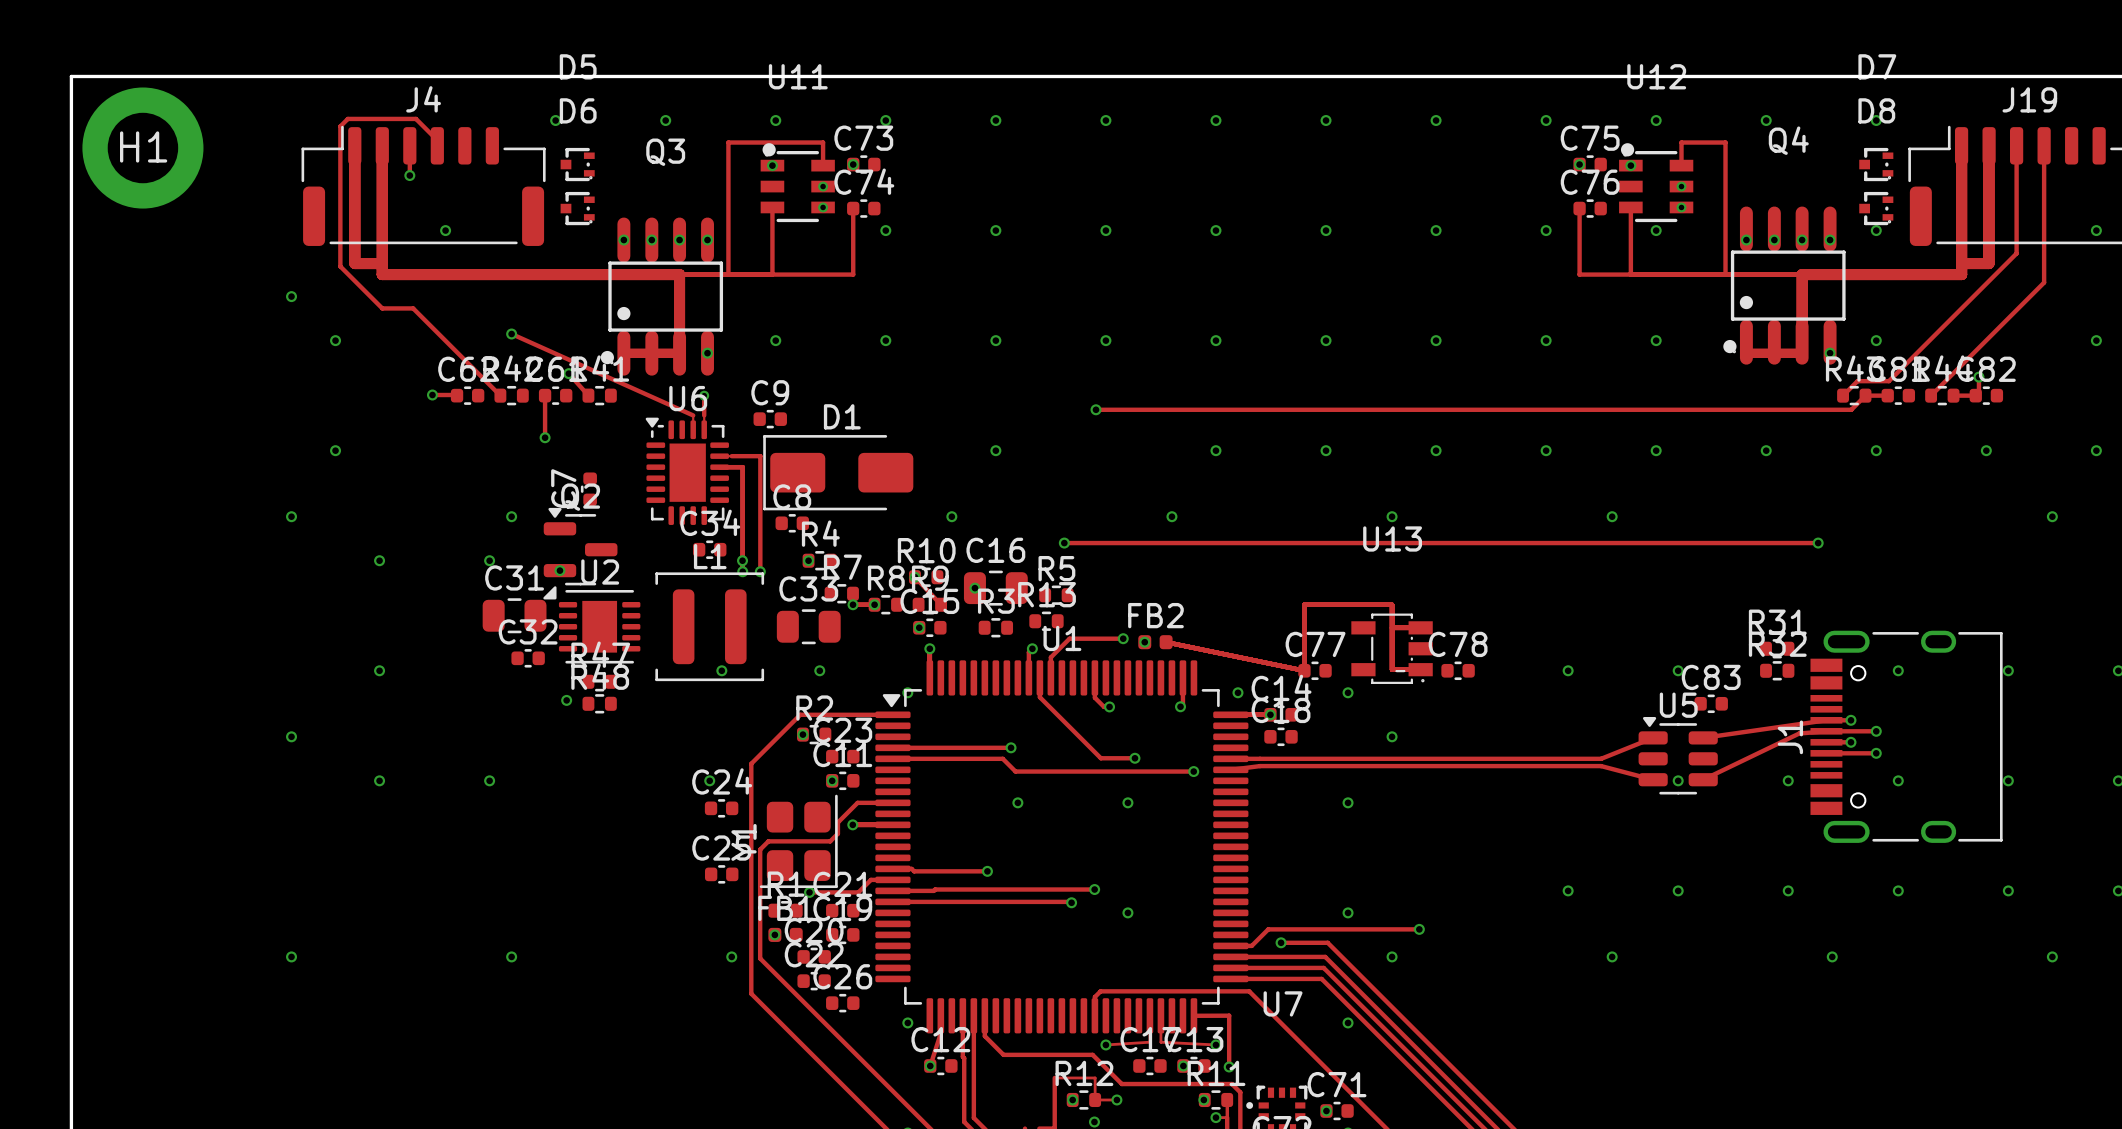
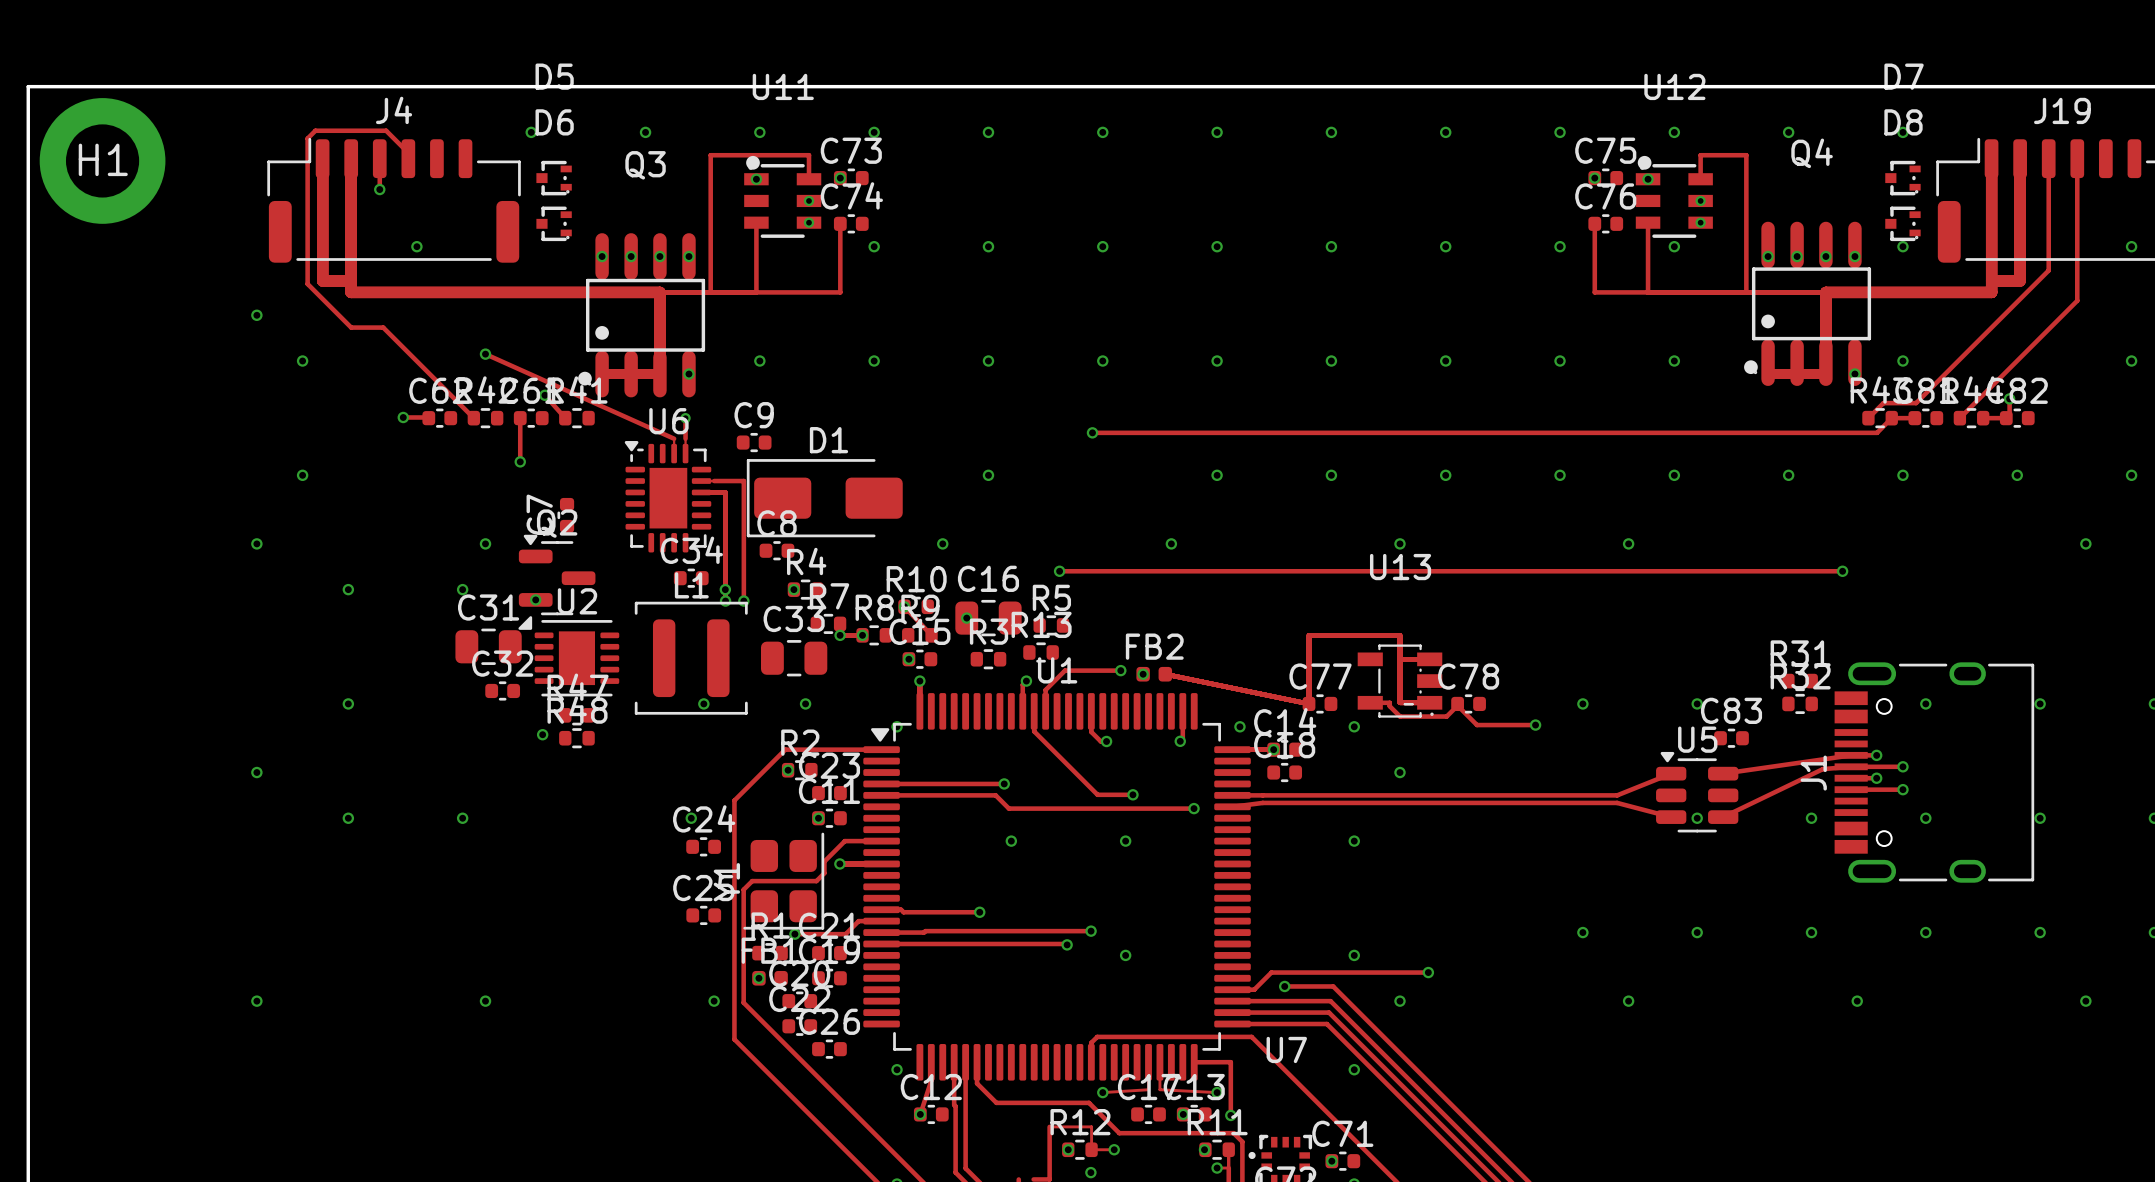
track: none -> (1370, 702) (1389, 702) (1389, 706) (1400, 716) (1446, 716) (1457, 705)
track: none -> (1457, 705) (1477, 725) (1535, 725)
via: none -> (1535, 725)

